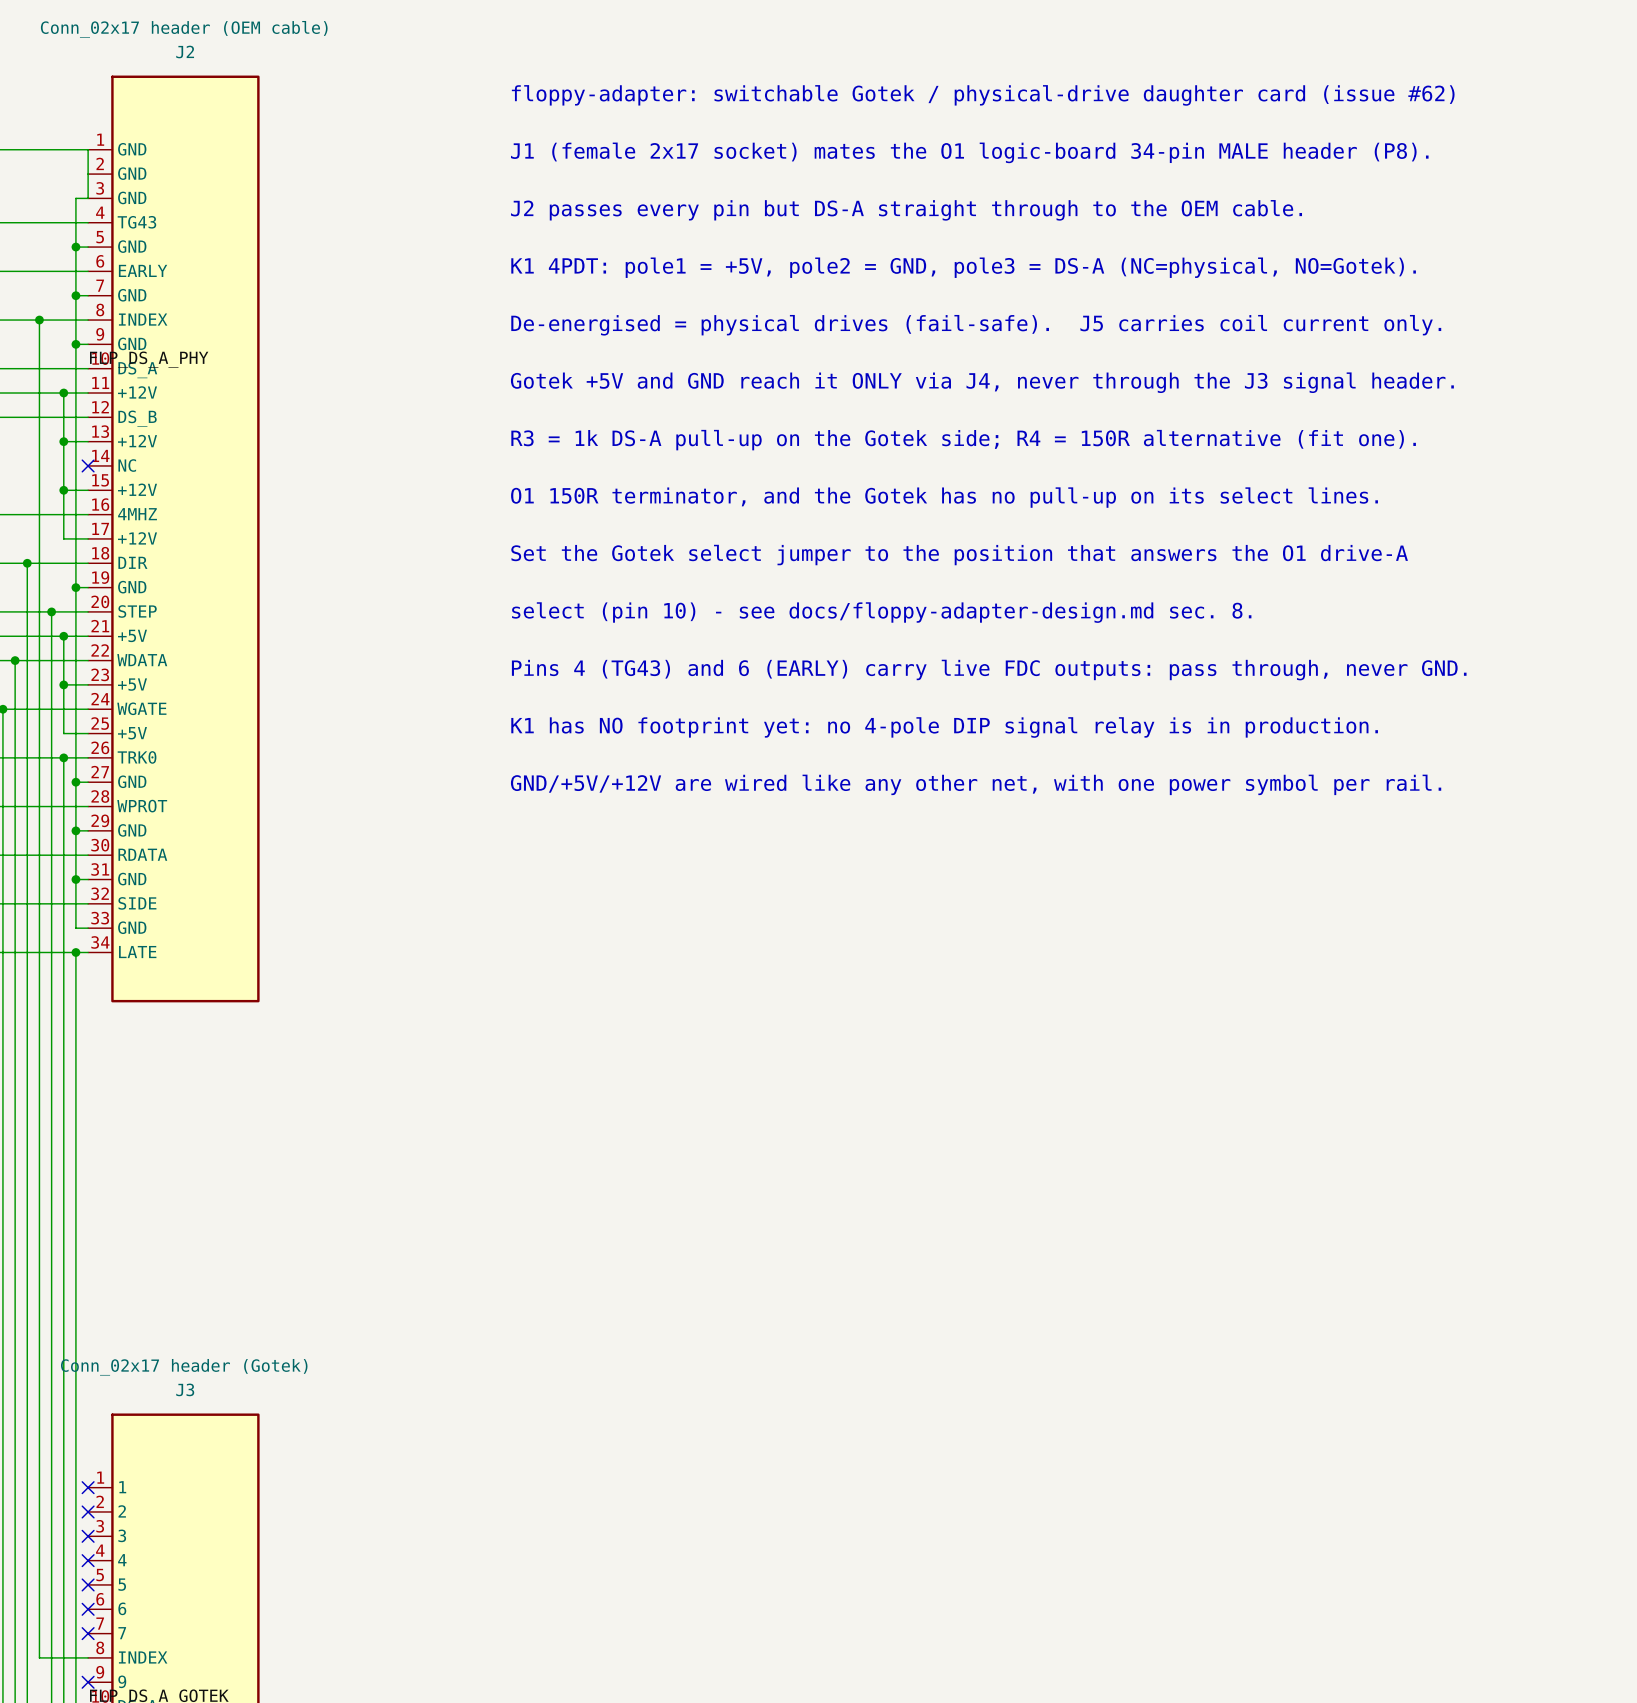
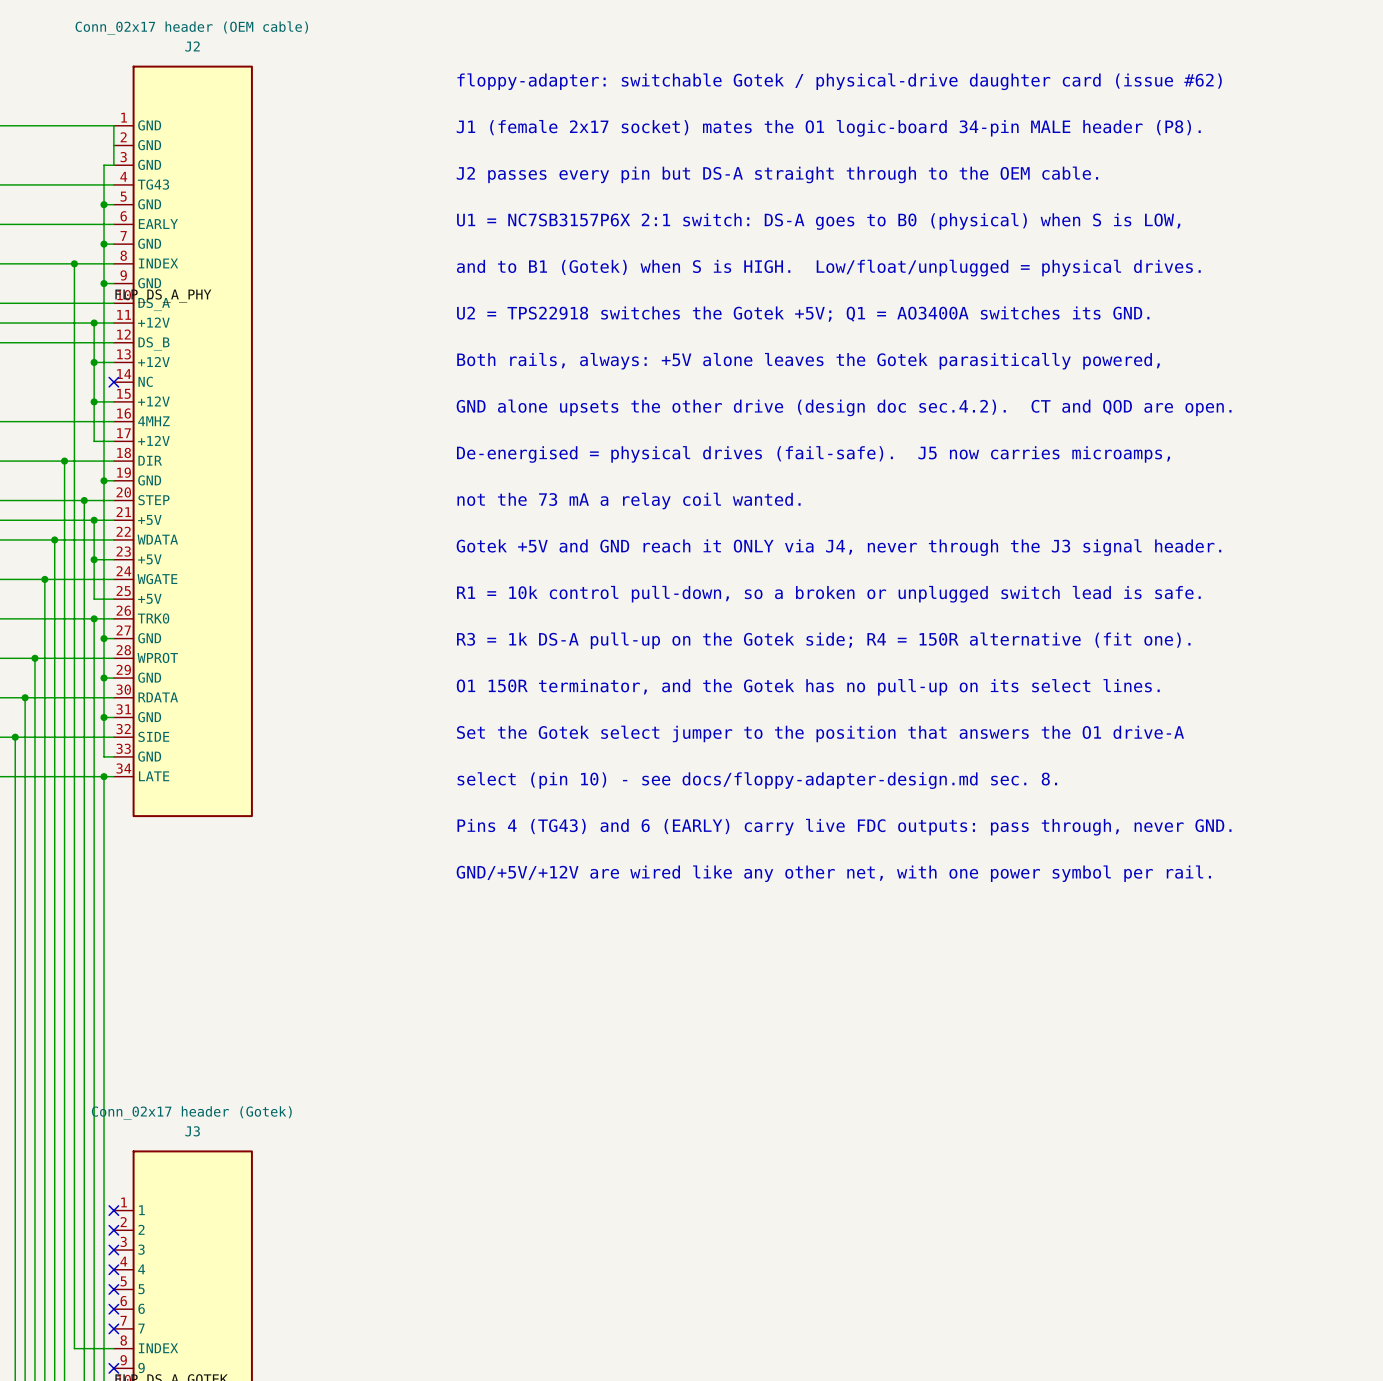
text: K1 4PDT: pole1 = +5V, pole2 = GND, pole3 = DS-A (NC=physical, NO=Gotek). (963, 267) -> U1 = NC7SB3157P6X 2:1 switch: DS-A goes to B0 (physical) when S is LOW, (818, 221)
text: De-energised = physical drives (fail-safe). J5 carries coil current only. (976, 325) -> and to B1 (Gotek) when S is HIGH. Low/float/unplugged = physical drives. (828, 268)
text: Gotek +5V and GND reach it ONLY via J4, never through the J3 signal header. (982, 382) -> U2 = TPS22918 switches the Gotek +5V; Q1 = AO3400A switches its GND. (803, 314)
text: R3 = 1k DS-A pull-up on the Gotek side; R4 = 150R alternative (fit one). (963, 440) -> Both rails, always: +5V alone leaves the Gotek parasitically powered, (808, 361)
text: O1 150R terminator, and the Gotek has no pull-up on its select lines. (944, 497) -> GND alone upsets the other drive (design doc sec.4.2). CT and QOD are open. (844, 407)
text: Set the Gotek select jumper to the position that answers the O1 drive-A (959, 555) -> De-energised = physical drives (fail-safe). J5 now carries microamps, (813, 454)
text: select (pin 10) - see docs/floppy-adapter-design.md sec. 8. (881, 612) -> not the 73 mA a relay coil wanted. (629, 500)
text: Pins 4 (TG43) and 6 (EARLY) carry live FDC outputs: pass through, never GND. (989, 670) -> Gotek +5V and GND reach it ONLY via J4, never through the J3 signal header. (838, 547)
text: K1 has NO footprint yet: no 4-pole DIP signal relay is in production. (944, 727) -> R1 = 10k control pull-down, so a broken or unplugged switch lead is safe. (828, 594)
text: GND/+5V/+12V are wired like any other net, with one power symbol per rail. (976, 784) -> R3 = 1k DS-A pull-up on the Gotek side; R4 = 150R alternative (fit one). (823, 640)
text: none -> O1 150R terminator, and the Gotek has no pull-up on its select lines. (808, 687)
text: none -> Set the Gotek select jumper to the position that answers the O1 drive-A (820, 733)
text: none -> select (pin 10) - see docs/floppy-adapter-design.md sec. 8. (757, 780)
text: none -> Pins 4 (TG43) and 6 (EARLY) carry live FDC outputs: pass through, never GND. (844, 827)
text: none -> GND/+5V/+12V are wired like any other net, with one power symbol per rail. (833, 873)

